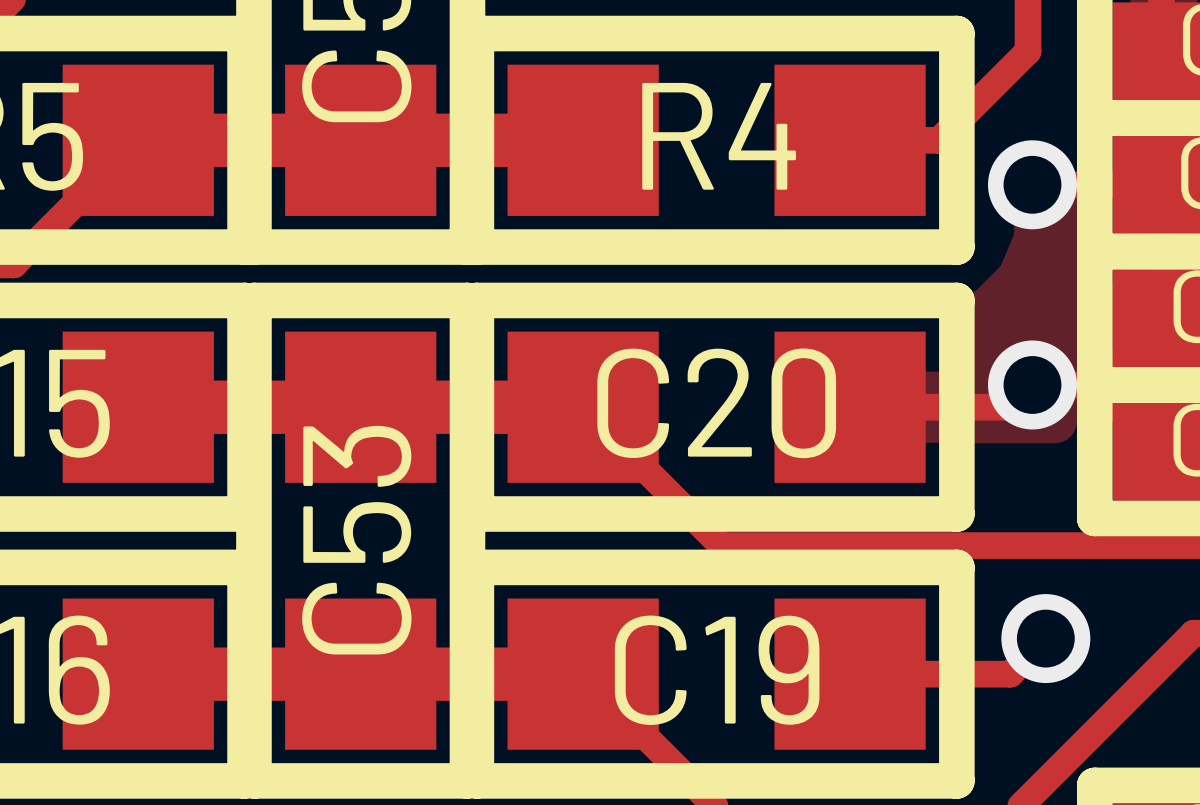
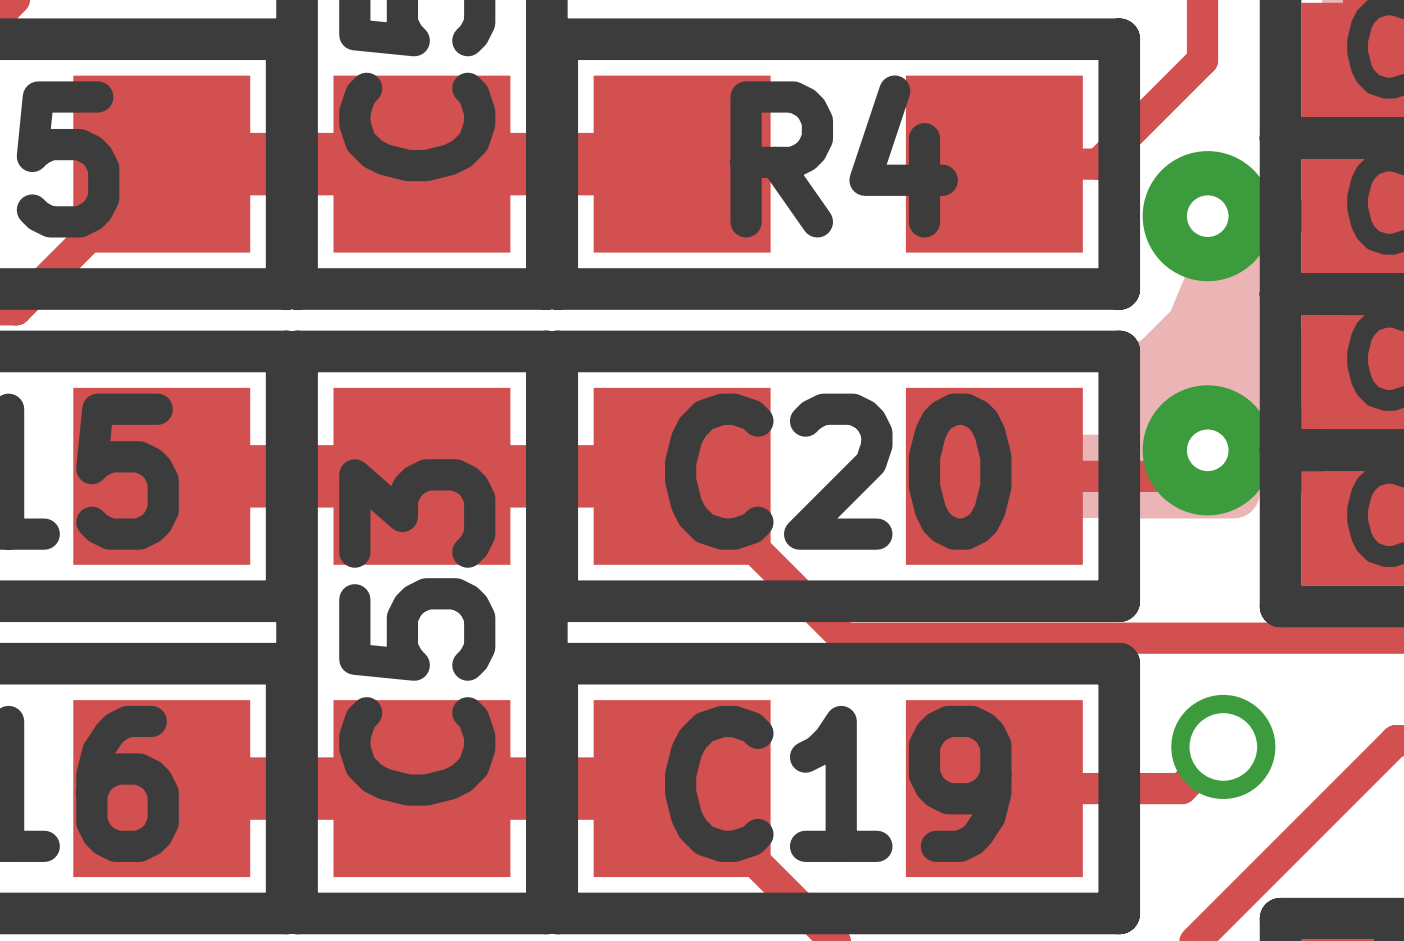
via size: [987, 140, 1077, 230] -> [1142, 151, 1273, 282]
via size: [987, 340, 1077, 430] -> [1142, 385, 1273, 516]

